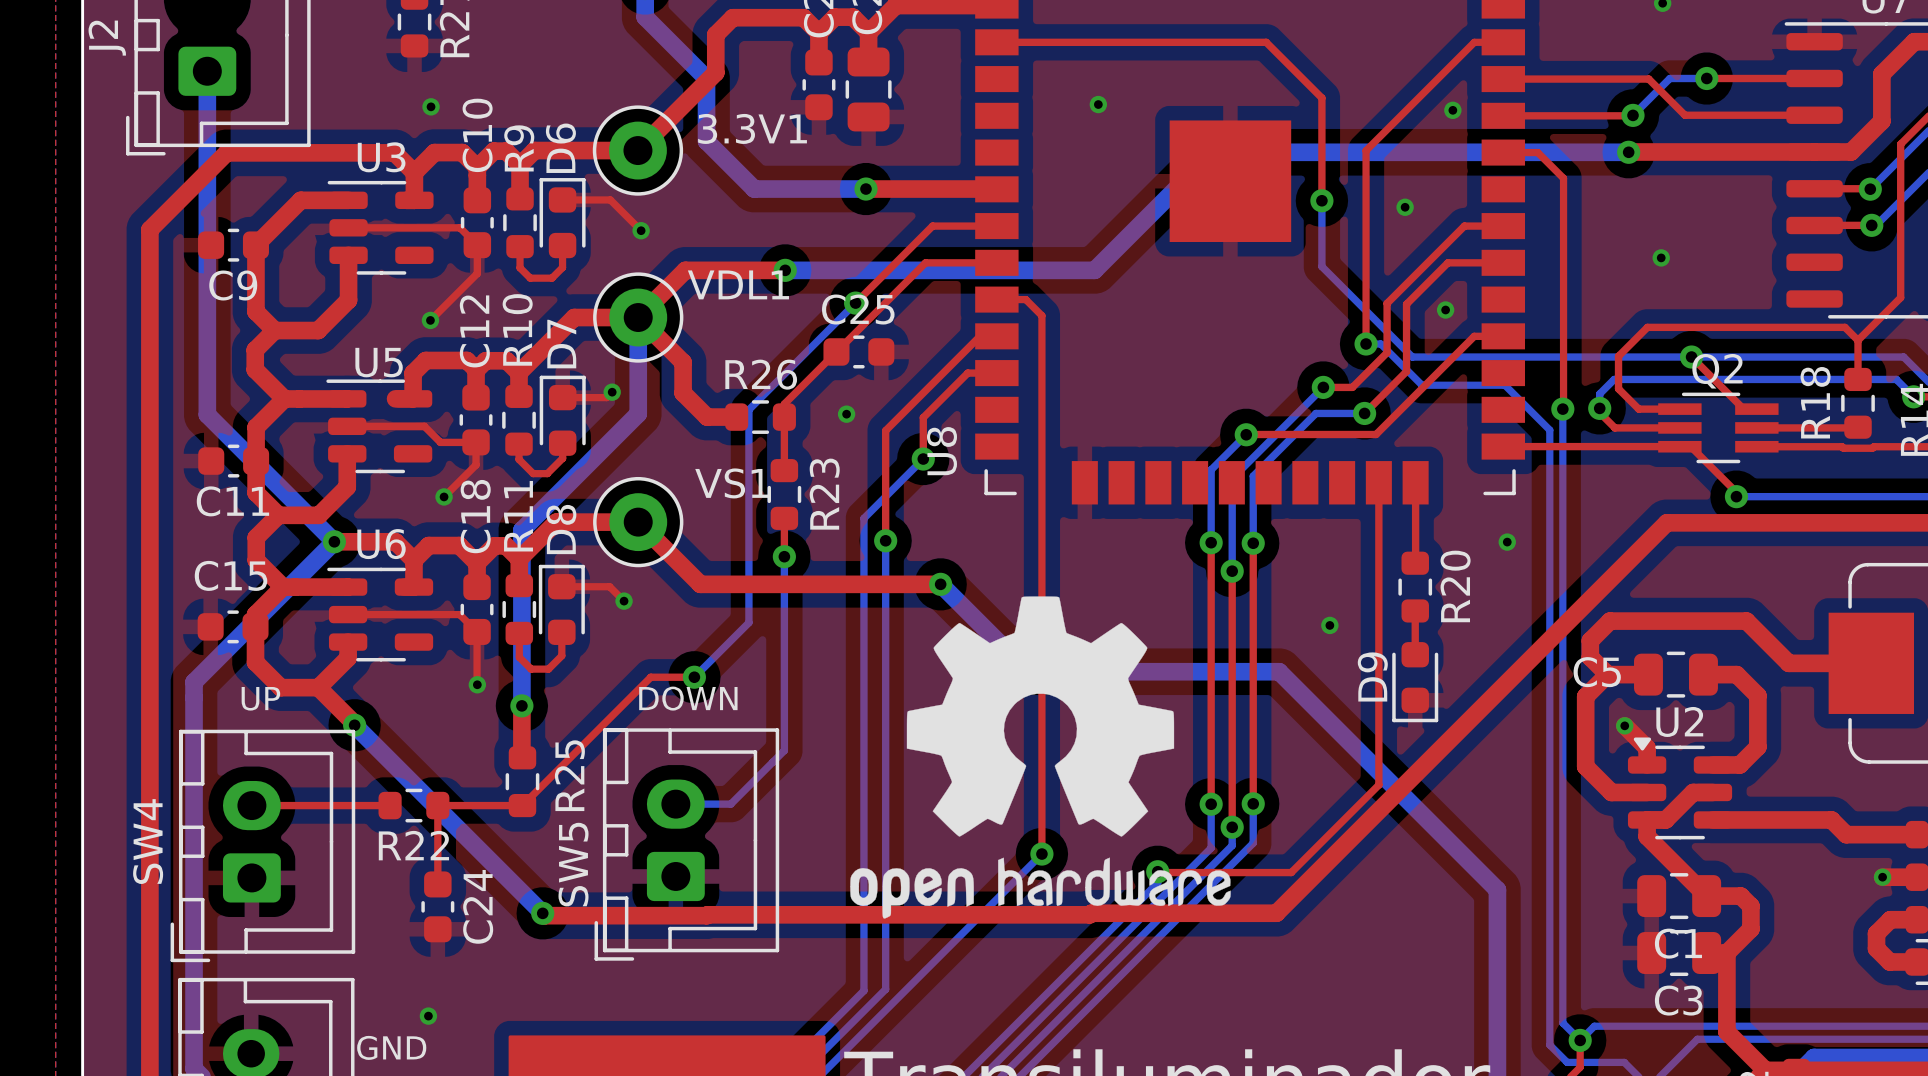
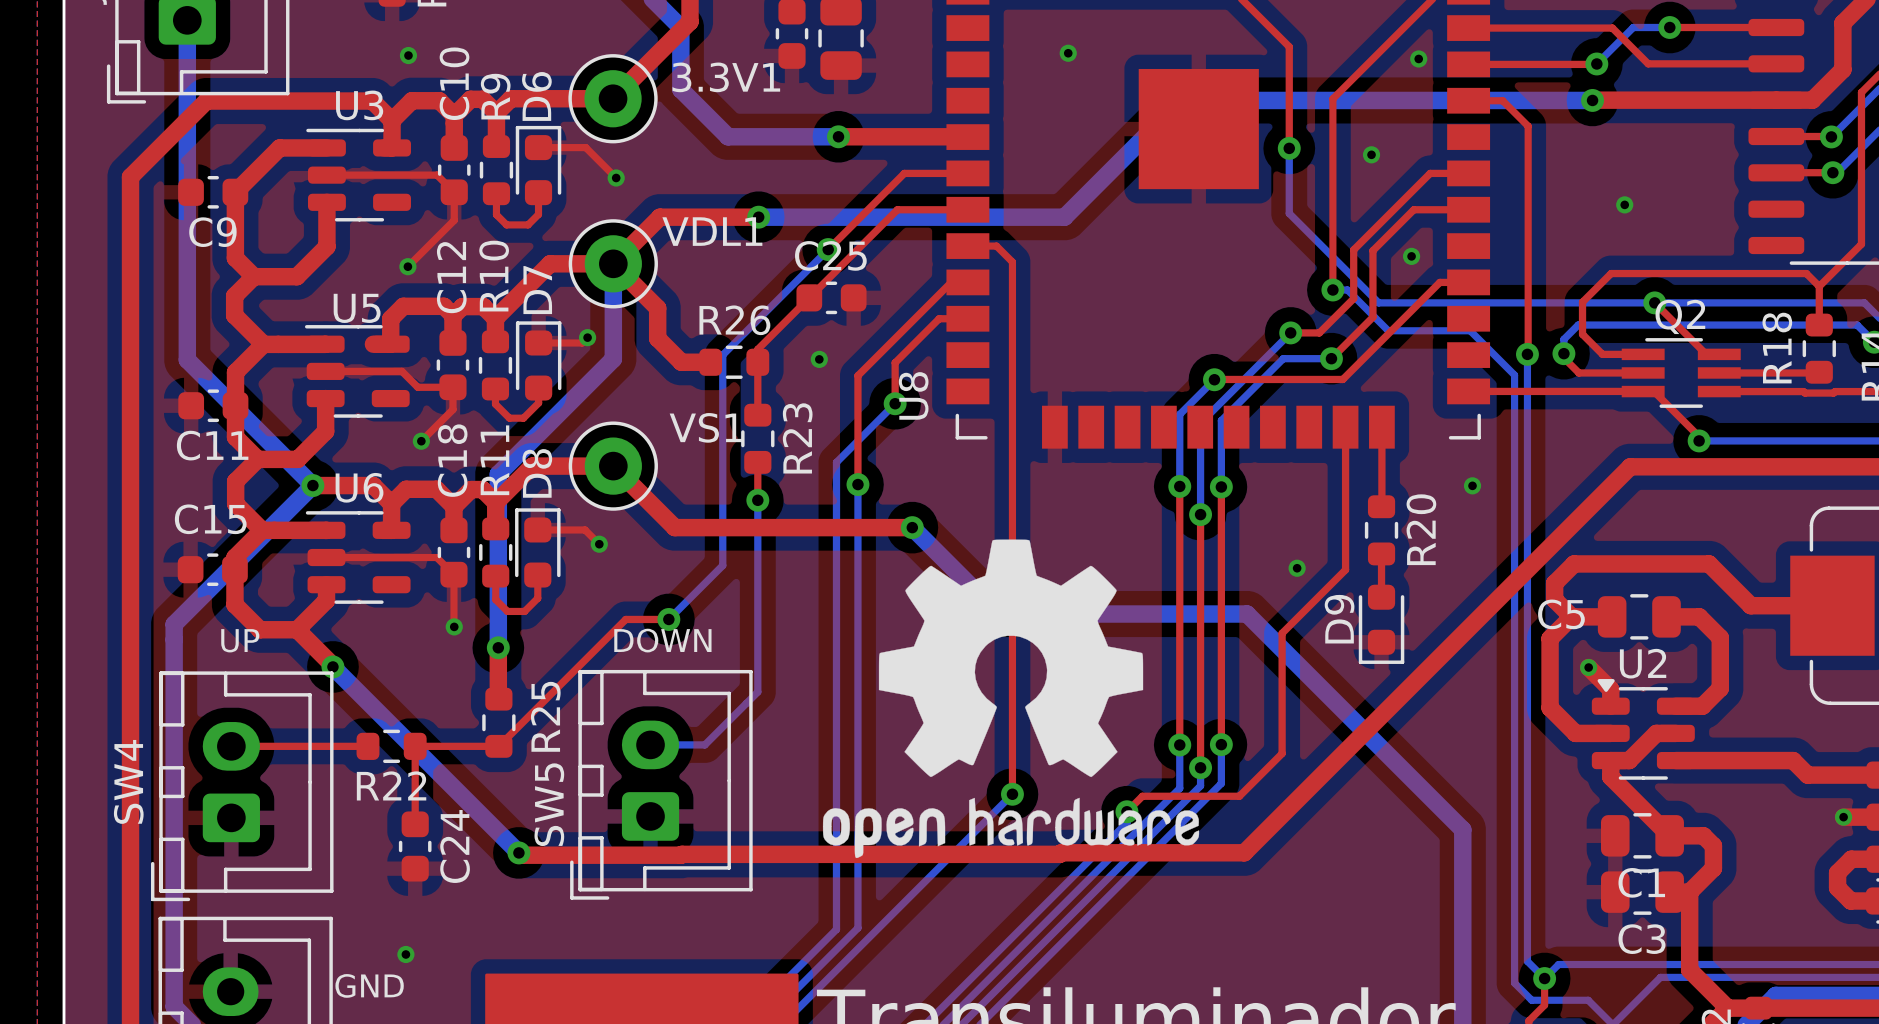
top track: (1378, 627) (1378, 784) (1291, 872) (1157, 871) -> (1345, 569) (1282, 633) (1282, 753) (1239, 796) (1142, 796) (1126, 811)

